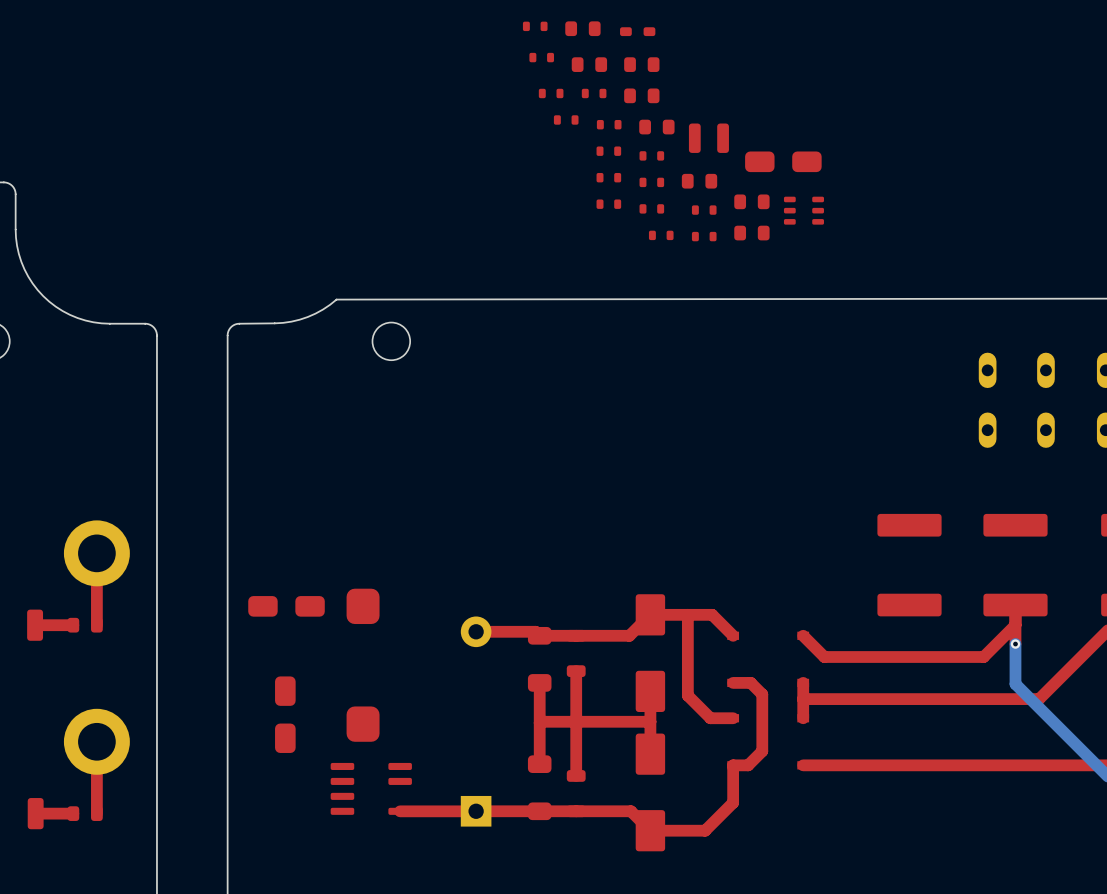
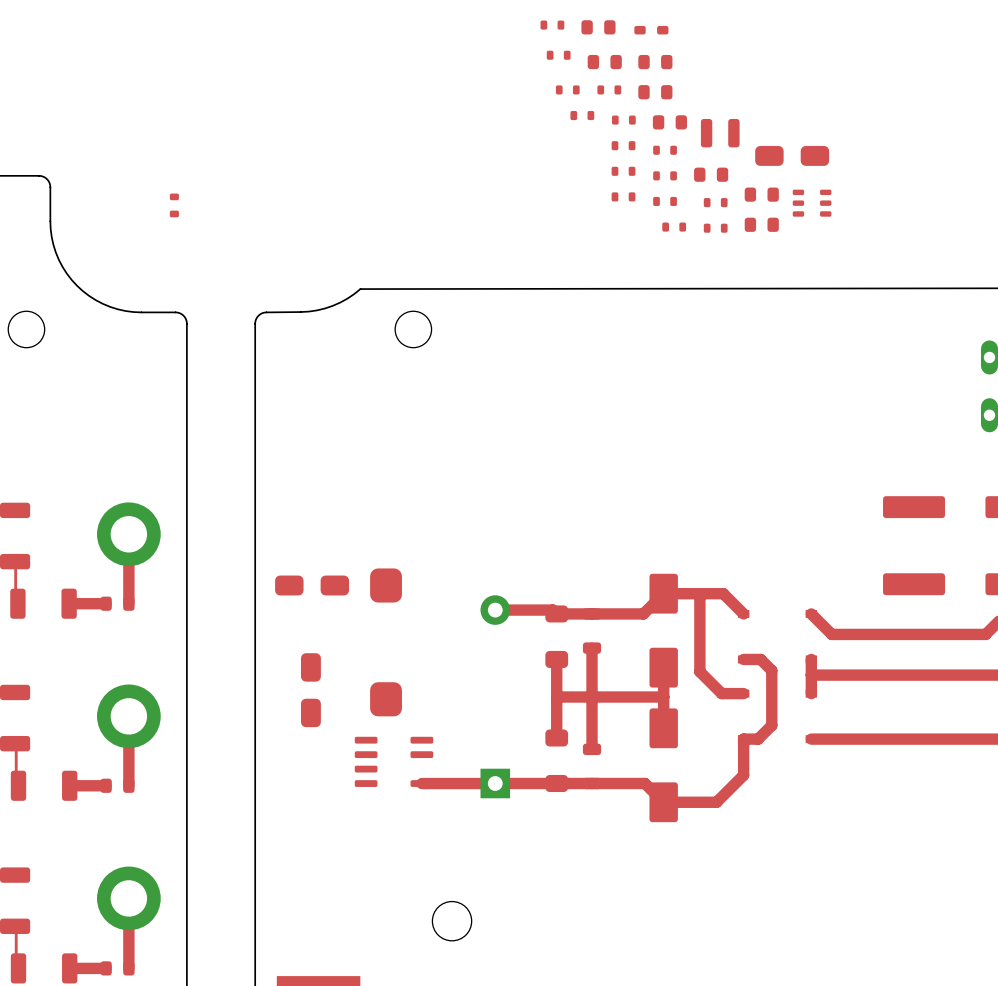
part: none -> (174, 205)

